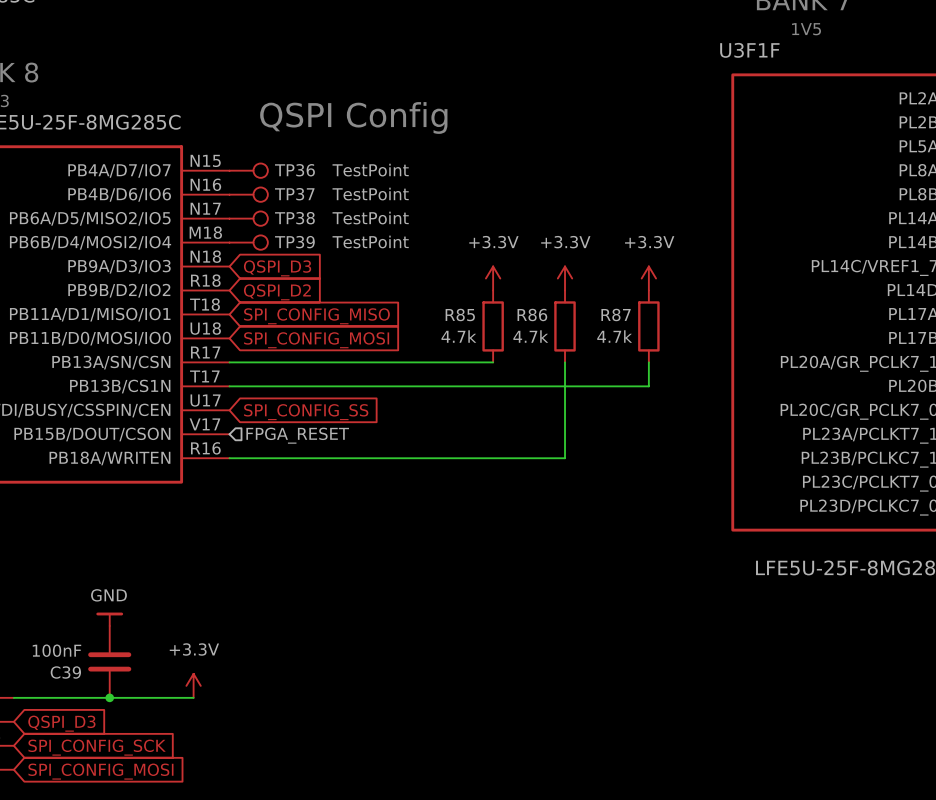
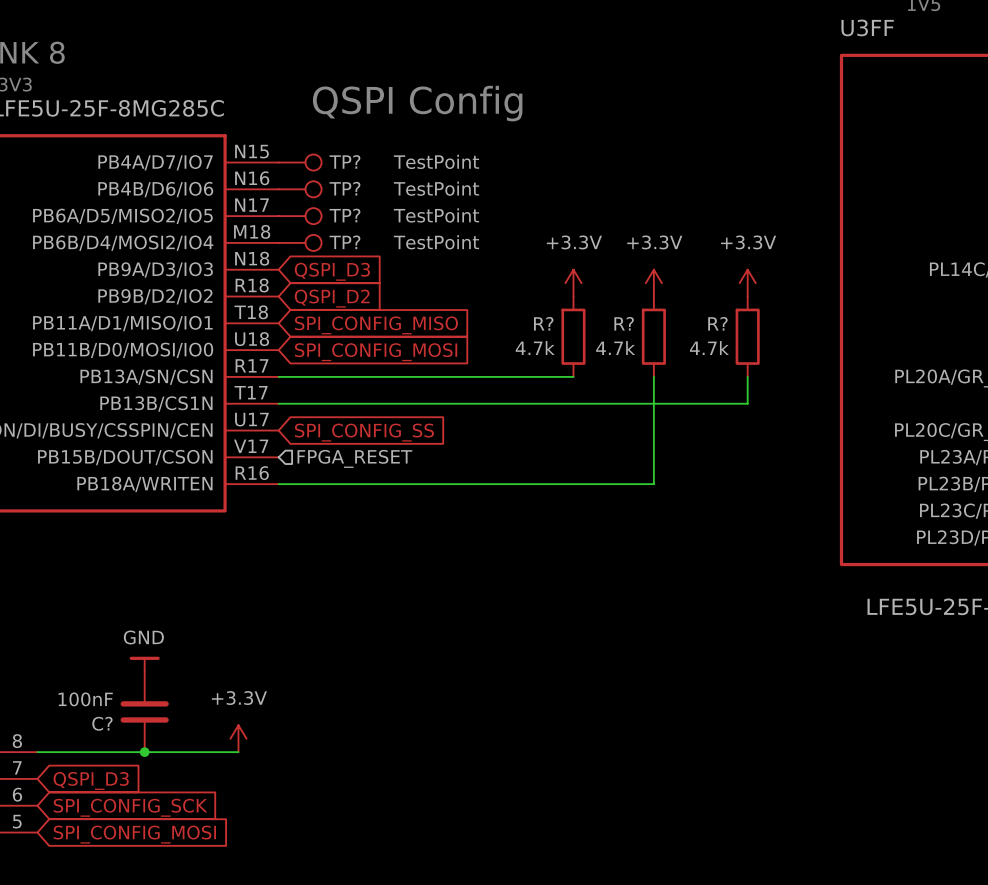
U3F1F name: U3F1F (749, 50) -> U3FF (867, 27)
TP36 name: TP36 (294, 170) -> TP? (344, 161)
TP37 name: TP37 (294, 194) -> TP? (344, 188)
TP38 name: TP38 (294, 218) -> TP? (344, 215)
TP39 name: TP39 (294, 242) -> TP? (344, 242)
R85 name: R85 (460, 314) -> R? (543, 323)
R86 name: R86 (532, 314) -> R? (624, 323)
R87 name: R87 (616, 314) -> R? (717, 323)
C39 name: C39 (65, 672) -> C? (102, 723)

